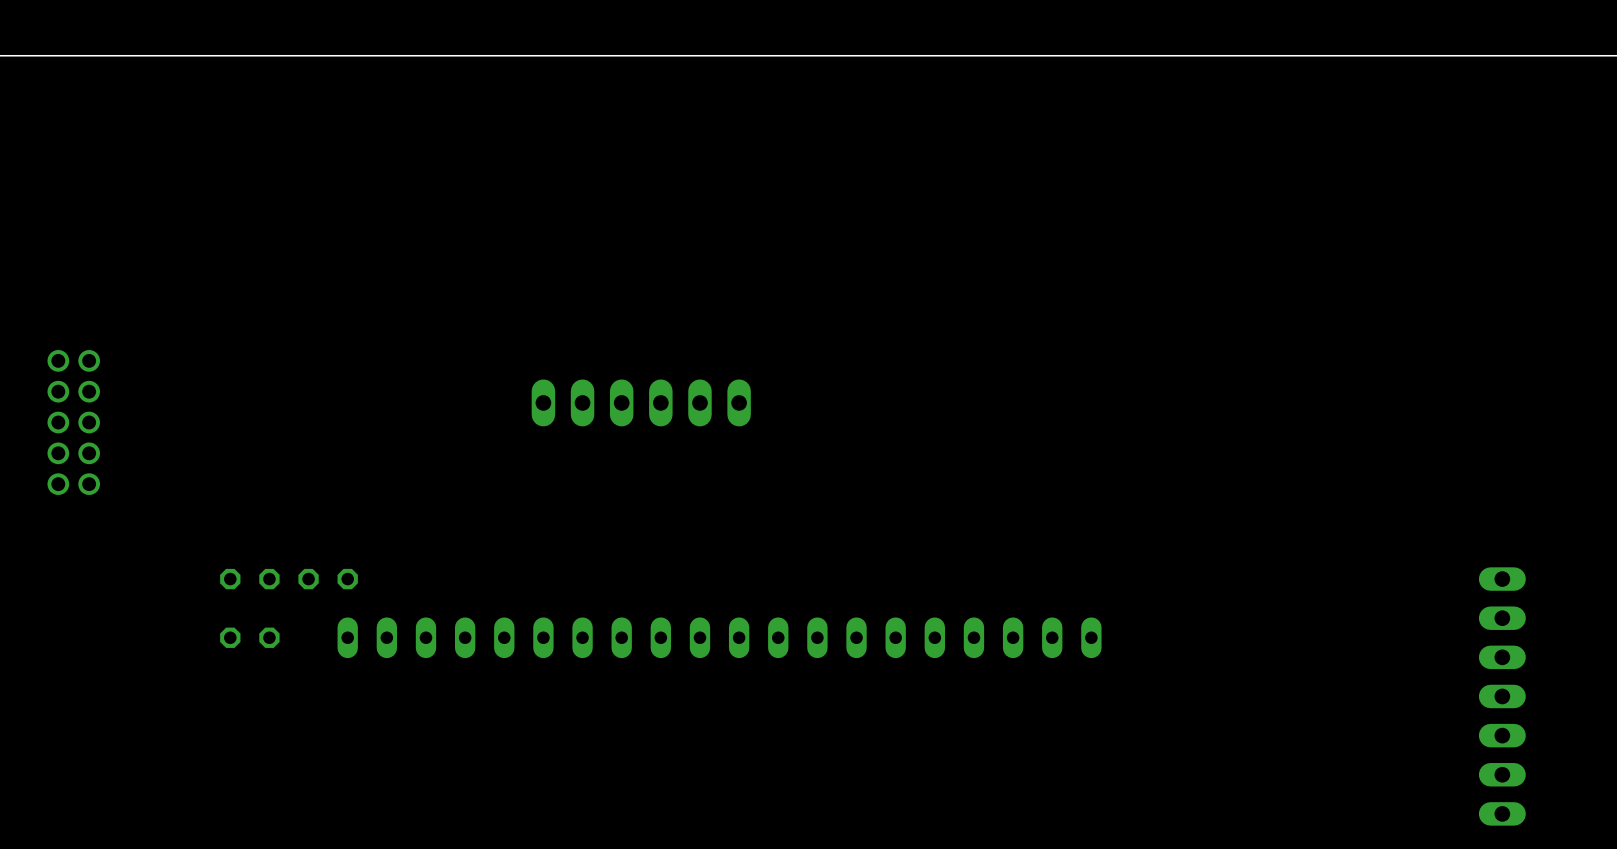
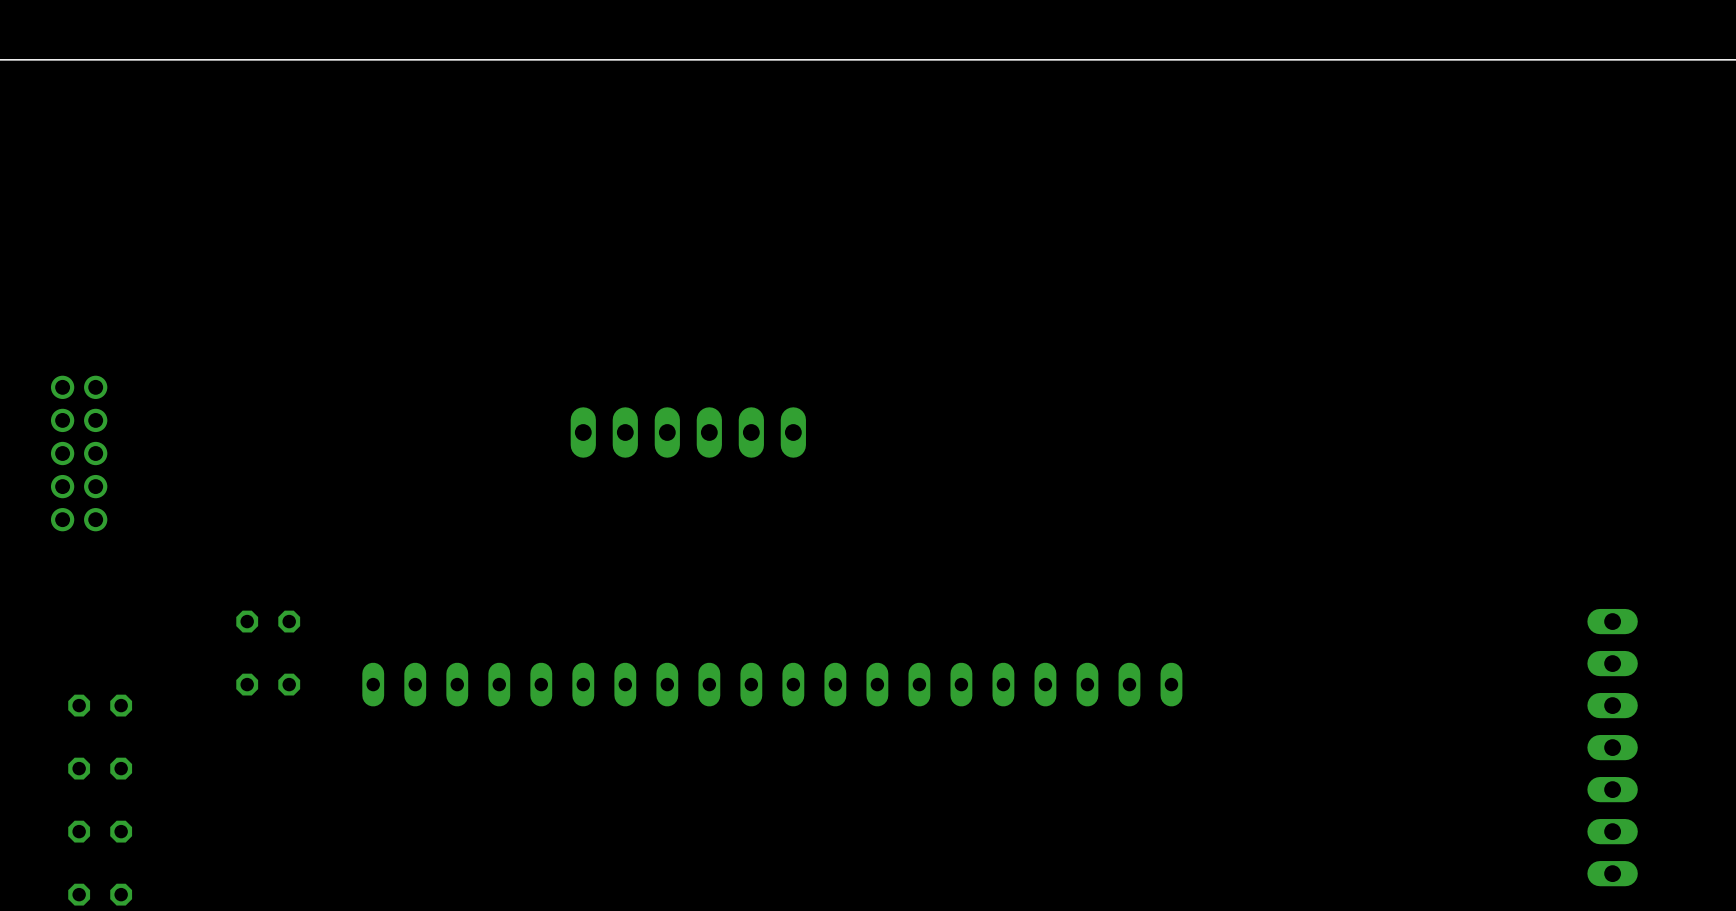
part: (328, 579) -> none
part: none -> (100, 705)
part: none -> (100, 768)
part: none -> (100, 831)
part: none -> (100, 894)

